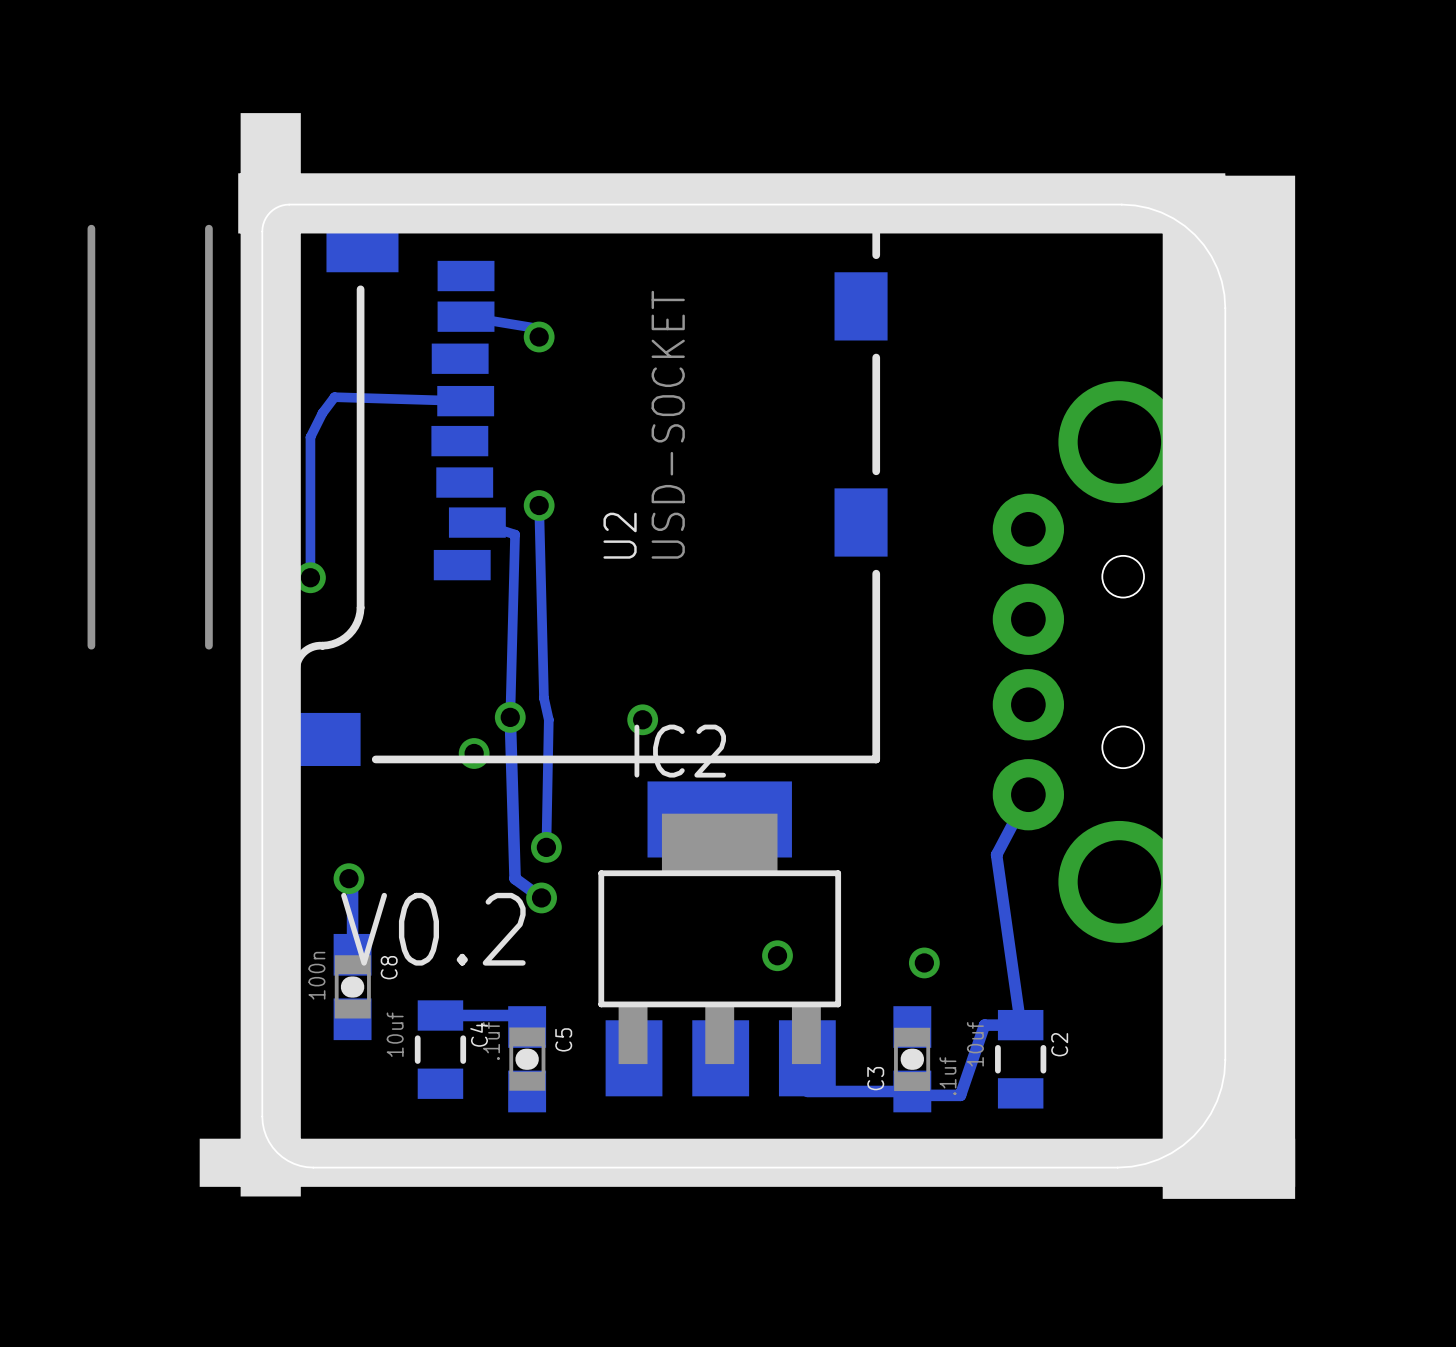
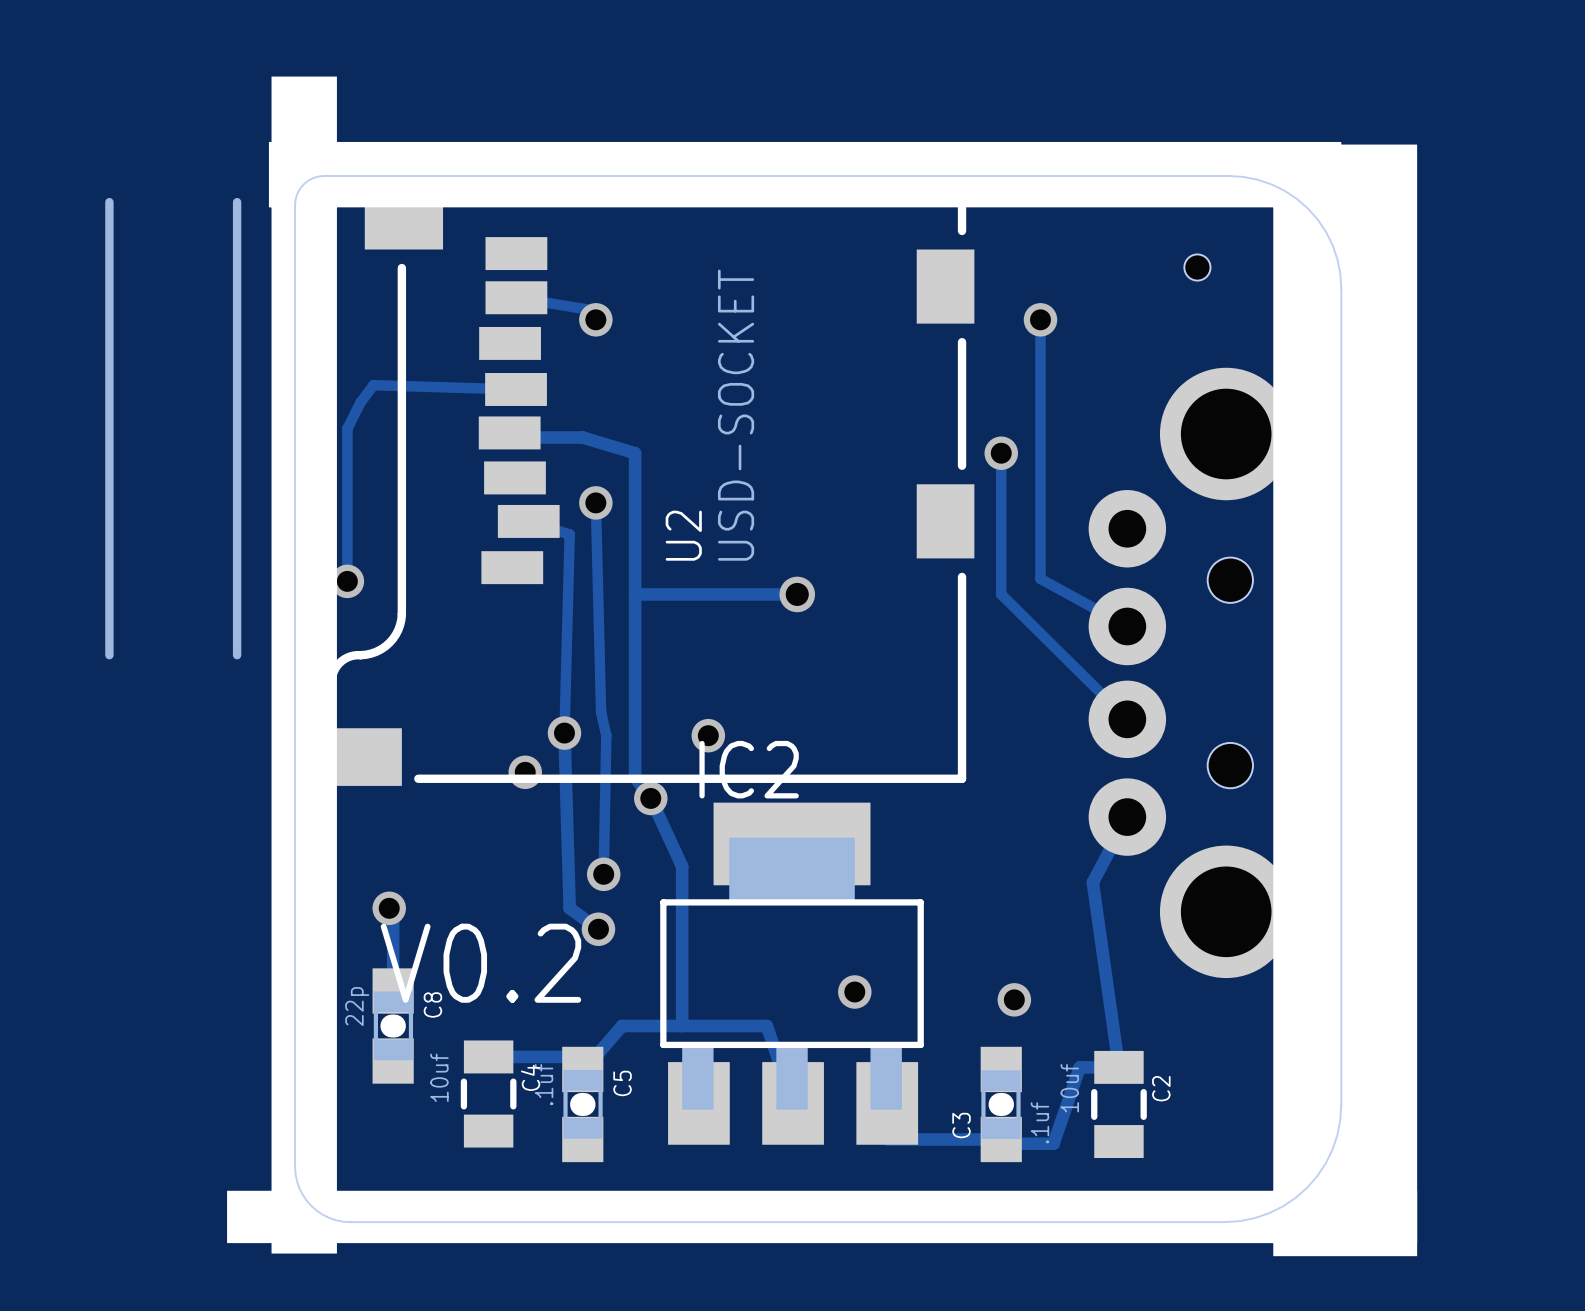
hole: none -> (1197, 267)
track: none -> (1040, 319) (1040, 578) (1127, 626)
via: none -> (1040, 319)
track: none -> (509, 432) (509, 437) (582, 437) (635, 453) (635, 777) (650, 798) (682, 866) (682, 1026)
track: none -> (1001, 453) (1001, 594) (1127, 719)
via: none -> (1001, 453)
track: none -> (797, 594) (635, 594)
via: none -> (797, 594)
via: none -> (650, 798)
C8 value: 100n (316, 975) -> 22p (357, 1006)
track: none -> (582, 1069) (622, 1026) (766, 1026) (793, 1103)

